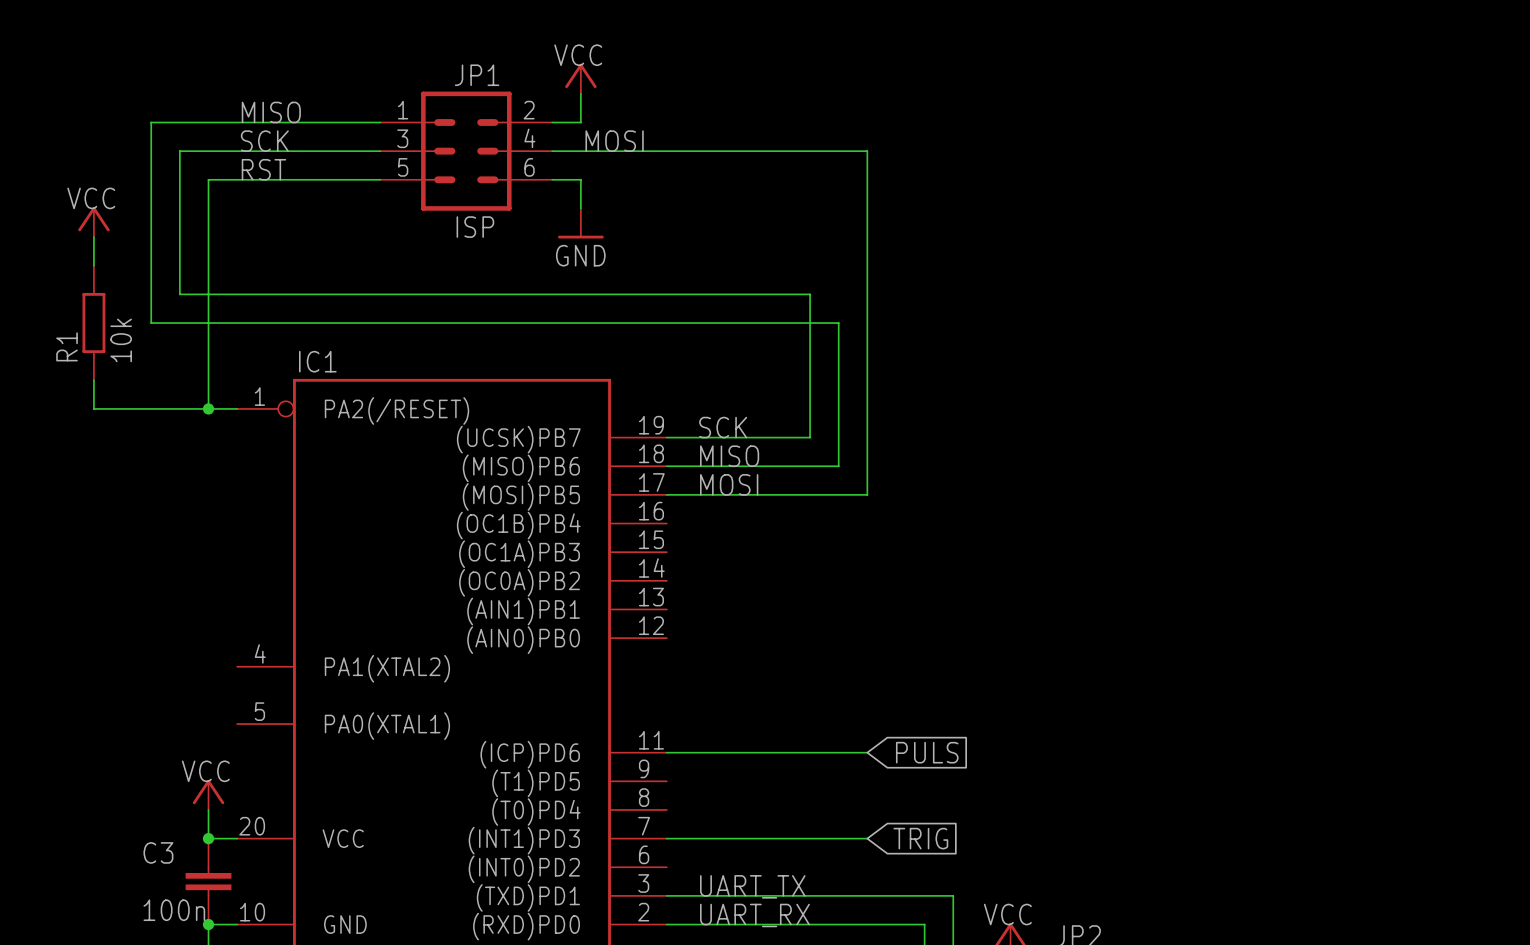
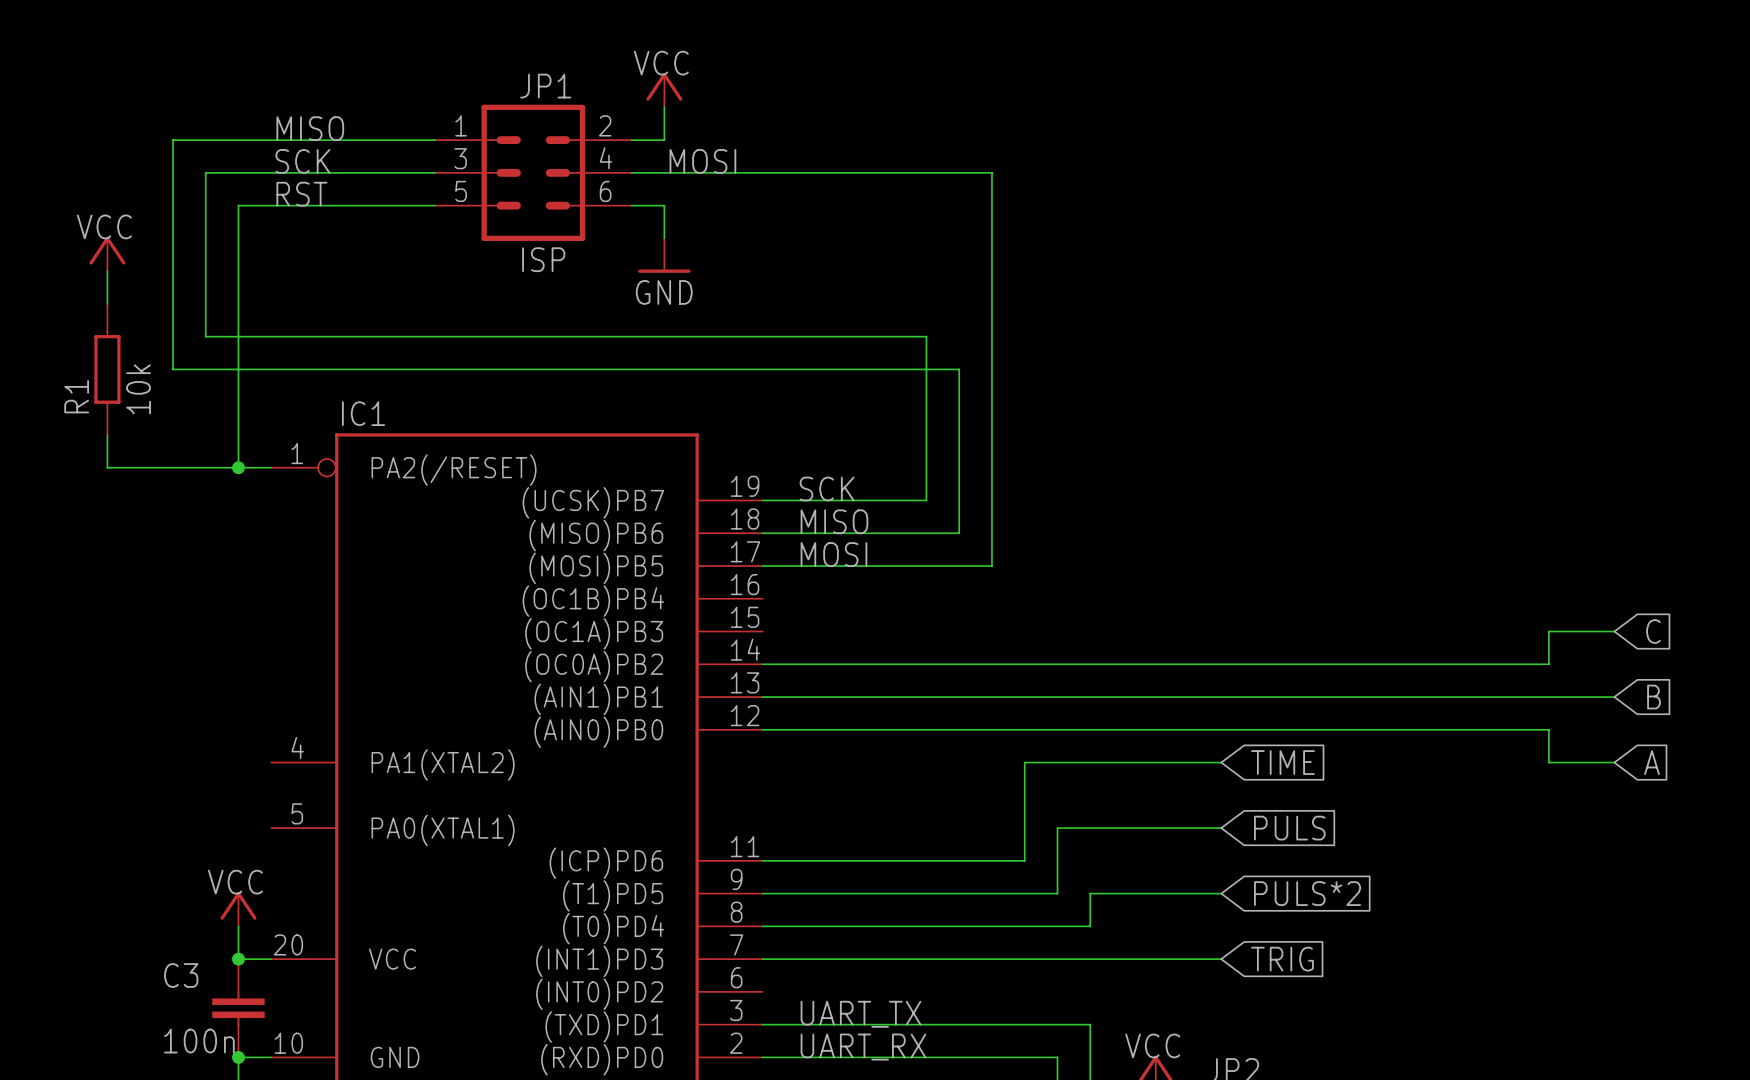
wire: none -> (1614, 631) (1548, 631) (1548, 664) (762, 664)
global label: none -> C (1653, 631)
wire: none -> (762, 697) (1614, 697)
global label: none -> B (1653, 697)
wire: none -> (762, 729) (1548, 729) (1548, 762) (1614, 762)
wire: none -> (1221, 762) (1024, 762) (1024, 860) (991, 860)
global label: none -> TIME (1282, 762)
global label: none -> A (1651, 762)
wire: none -> (1221, 828) (1057, 828) (1057, 893) (762, 893)
global label position: PULS (927, 752) -> PULS (1289, 828)
wire: none -> (1221, 893) (1090, 893) (1090, 926) (762, 926)
global label: none -> PULS*2 (1307, 893)
wire: none -> (991, 959) (1221, 959)
global label position: TRIG (920, 838) -> TRIG (1282, 959)

